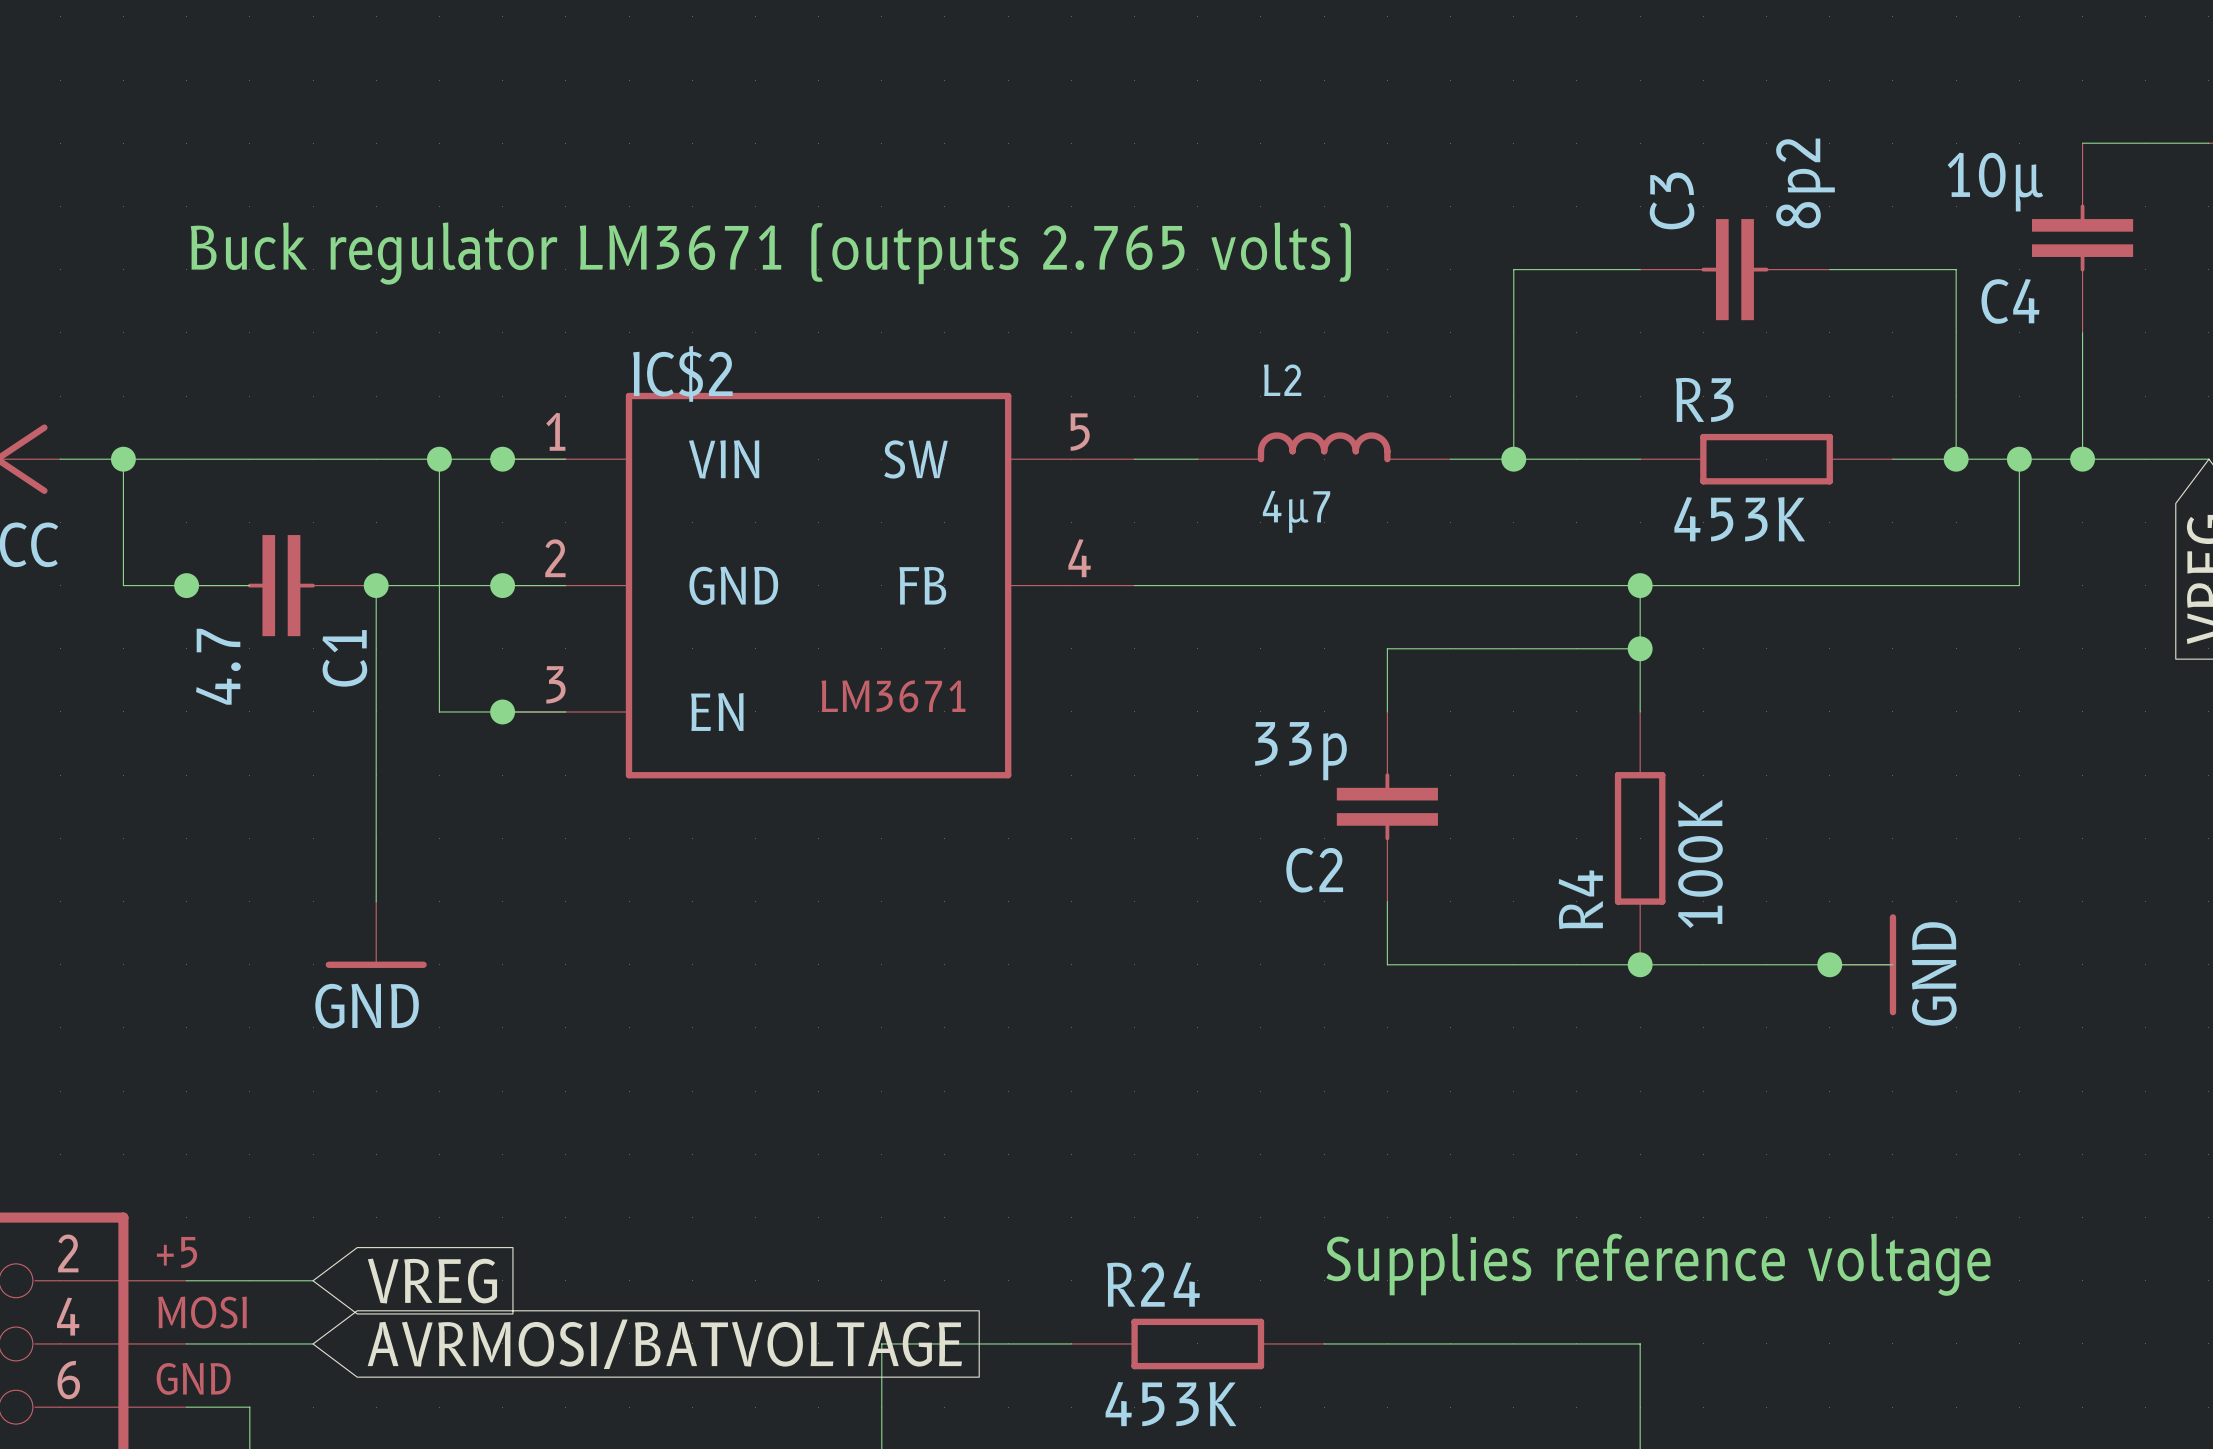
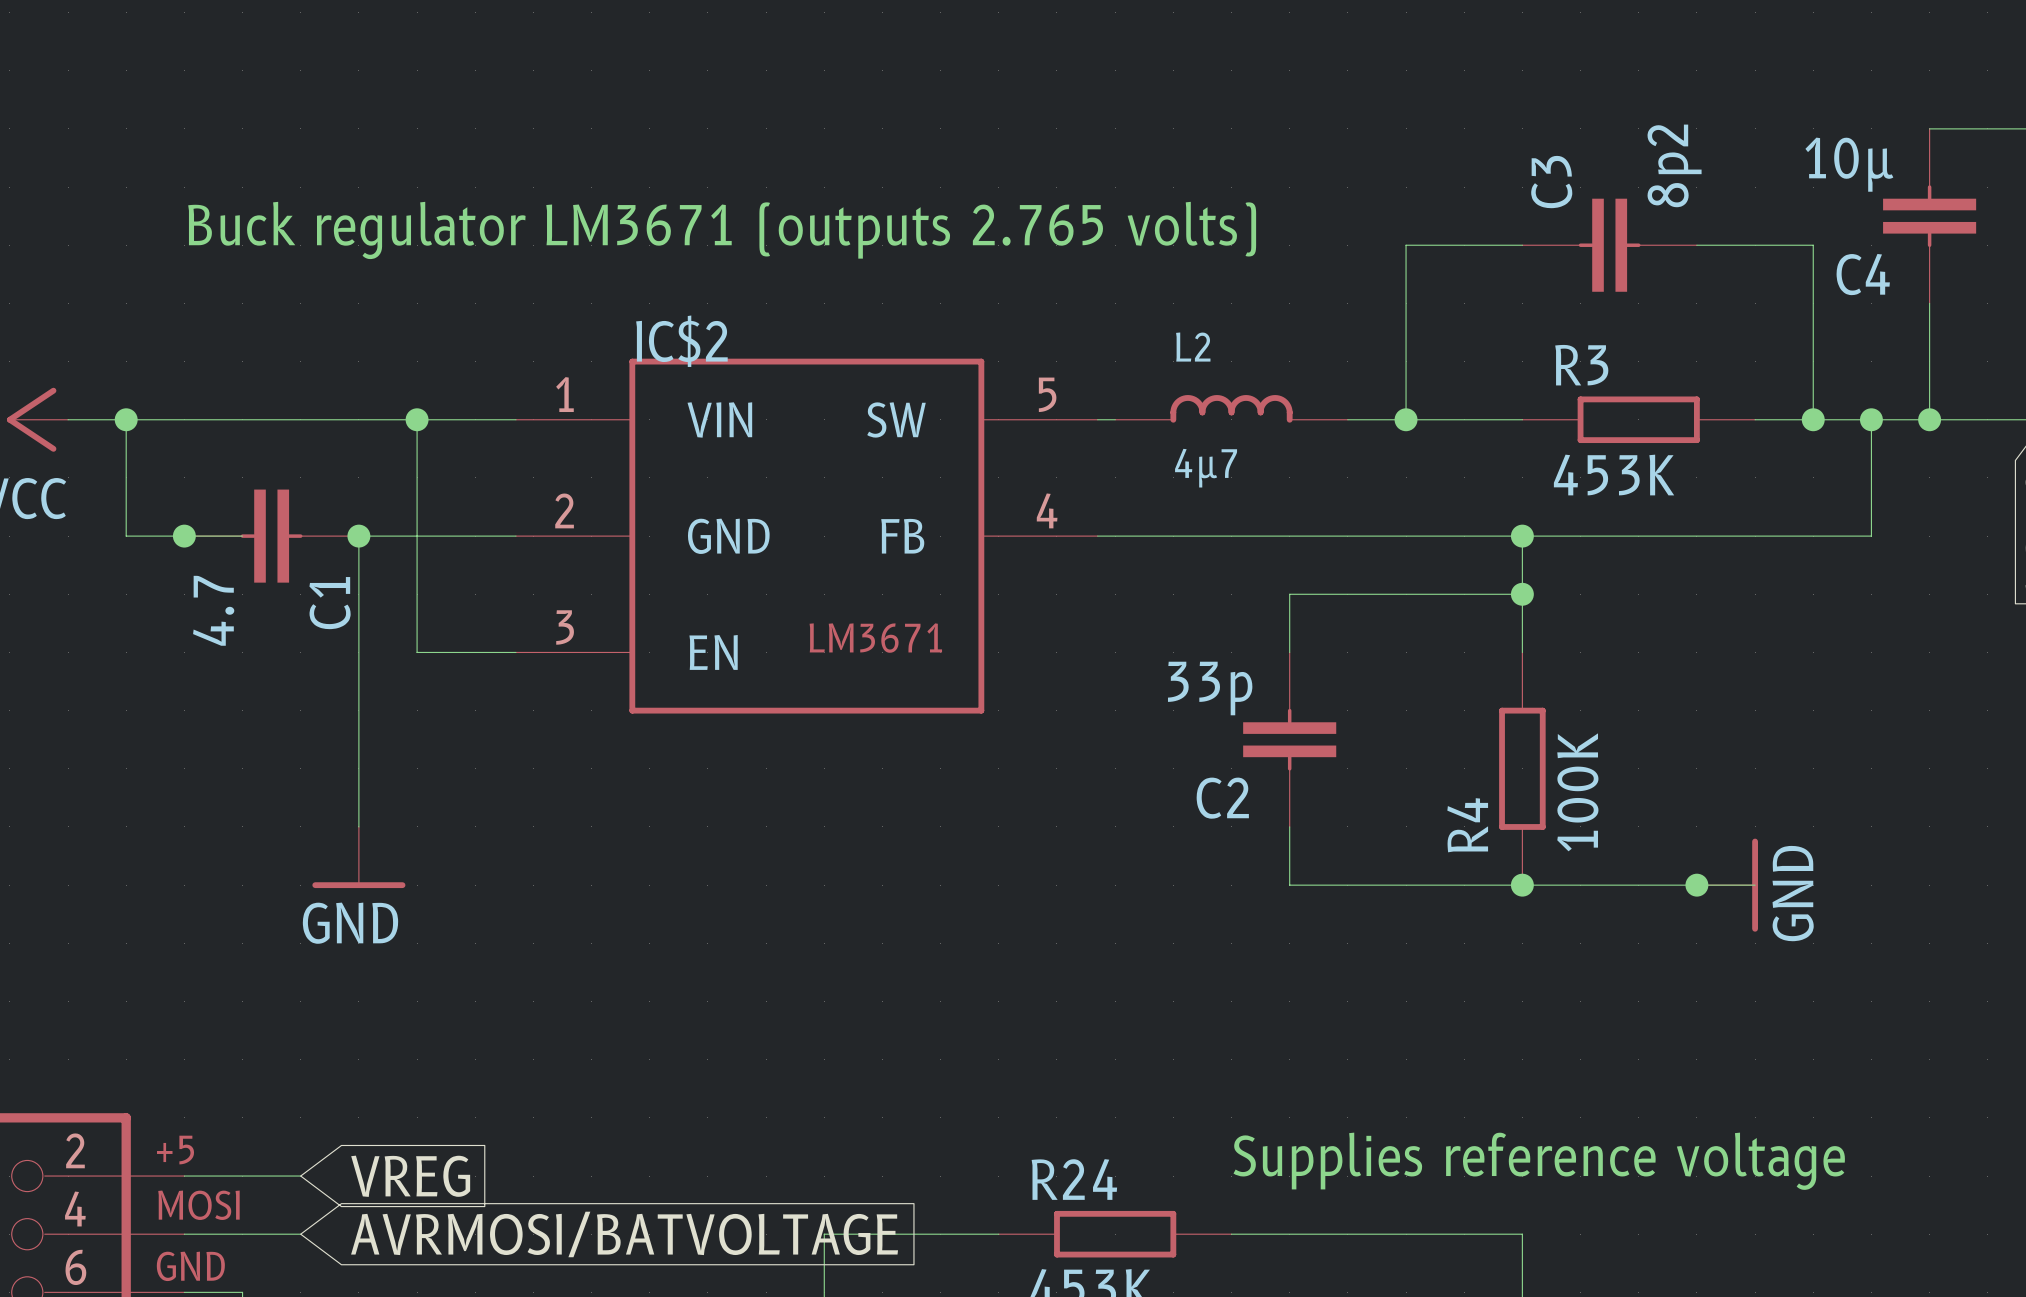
junction: (502, 459) -> none
junction: (502, 585) -> none
IC$2 position: (818, 585) -> (806, 536)
junction: (502, 711) -> none

